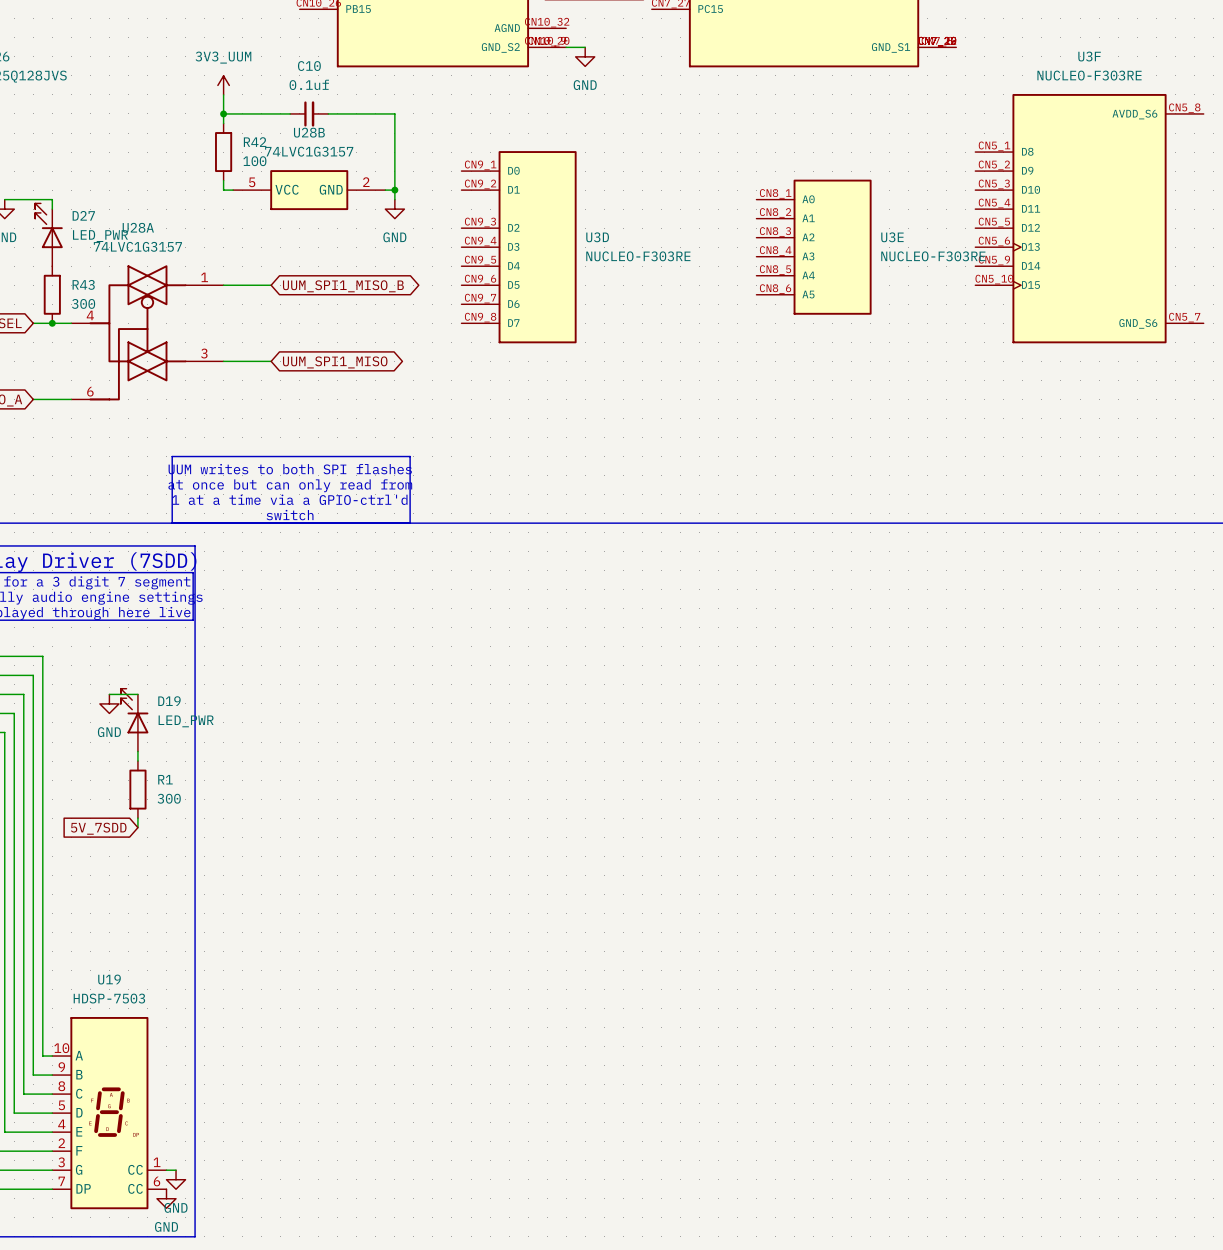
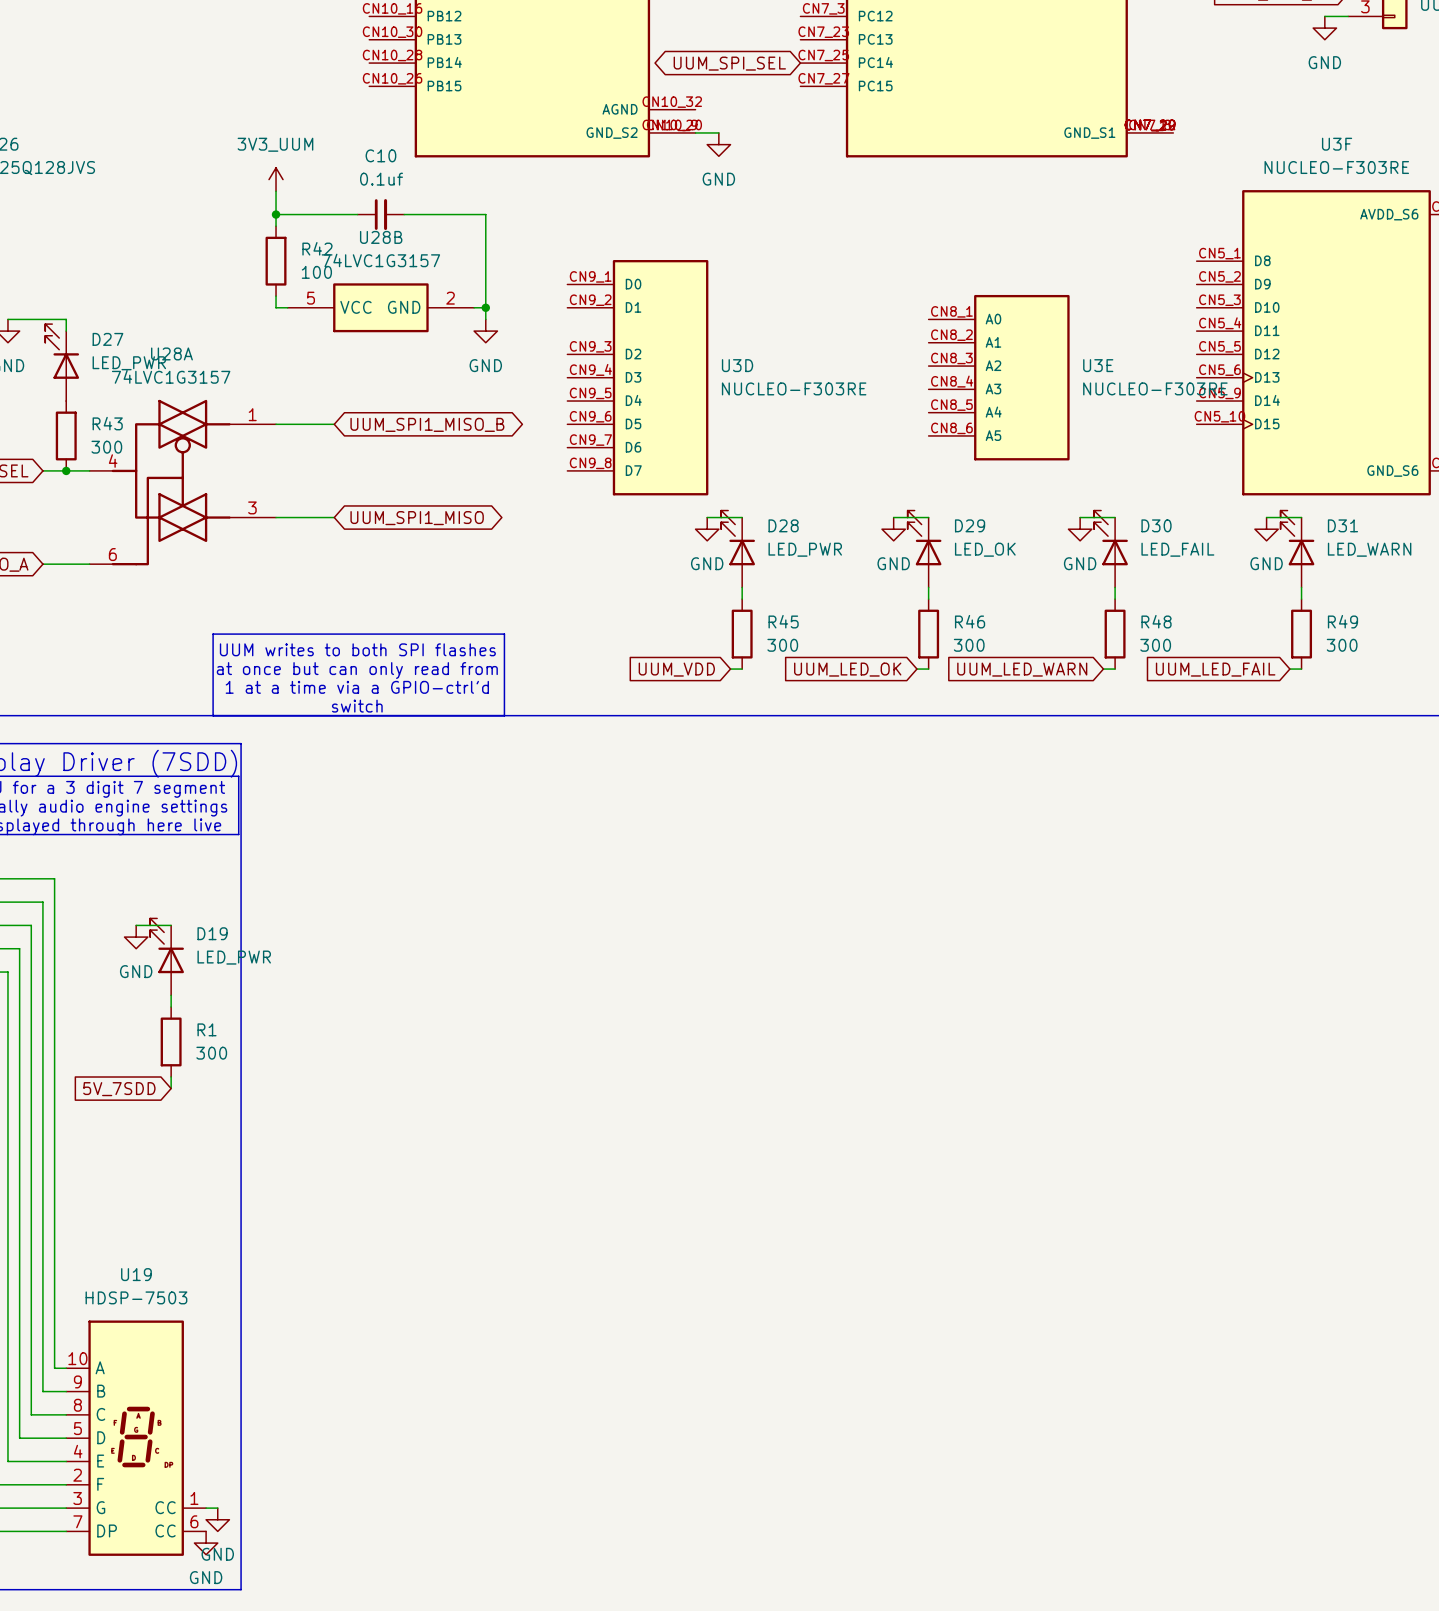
wire: none -> (707, 517) (742, 517)
wire: none -> (893, 517) (928, 517)
wire: none -> (1080, 517) (1115, 517)
wire: none -> (1266, 517) (1301, 517)
power symbol: none -> GND (707, 529)
power symbol: none -> GND (893, 529)
power symbol: none -> GND (1080, 529)
power symbol: none -> GND (1266, 529)
D28: none -> LED_PWR (738, 549)
D29: none -> LED_OK (924, 549)
D30: none -> LED_FAIL (1111, 549)
D31: none -> LED_WARN (1297, 549)
wire: none -> (742, 587) (742, 599)
wire: none -> (928, 587) (928, 599)
wire: none -> (1115, 587) (1115, 599)
wire: none -> (1301, 587) (1301, 599)
R45: none -> 300 (742, 634)
R46: none -> 300 (928, 634)
R48: none -> 300 (1115, 634)
R49: none -> 300 (1301, 634)
wire: none -> (730, 669) (742, 669)
wire: none -> (916, 669) (928, 669)
wire: none -> (1103, 669) (1115, 669)
wire: none -> (1289, 669) (1301, 669)
global label: none -> UUM_VDD (676, 669)
global label: none -> UUM_LED_OK (847, 669)
global label: none -> UUM_LED_WARN (1022, 669)
global label: none -> UUM_LED_FAIL (1215, 669)

